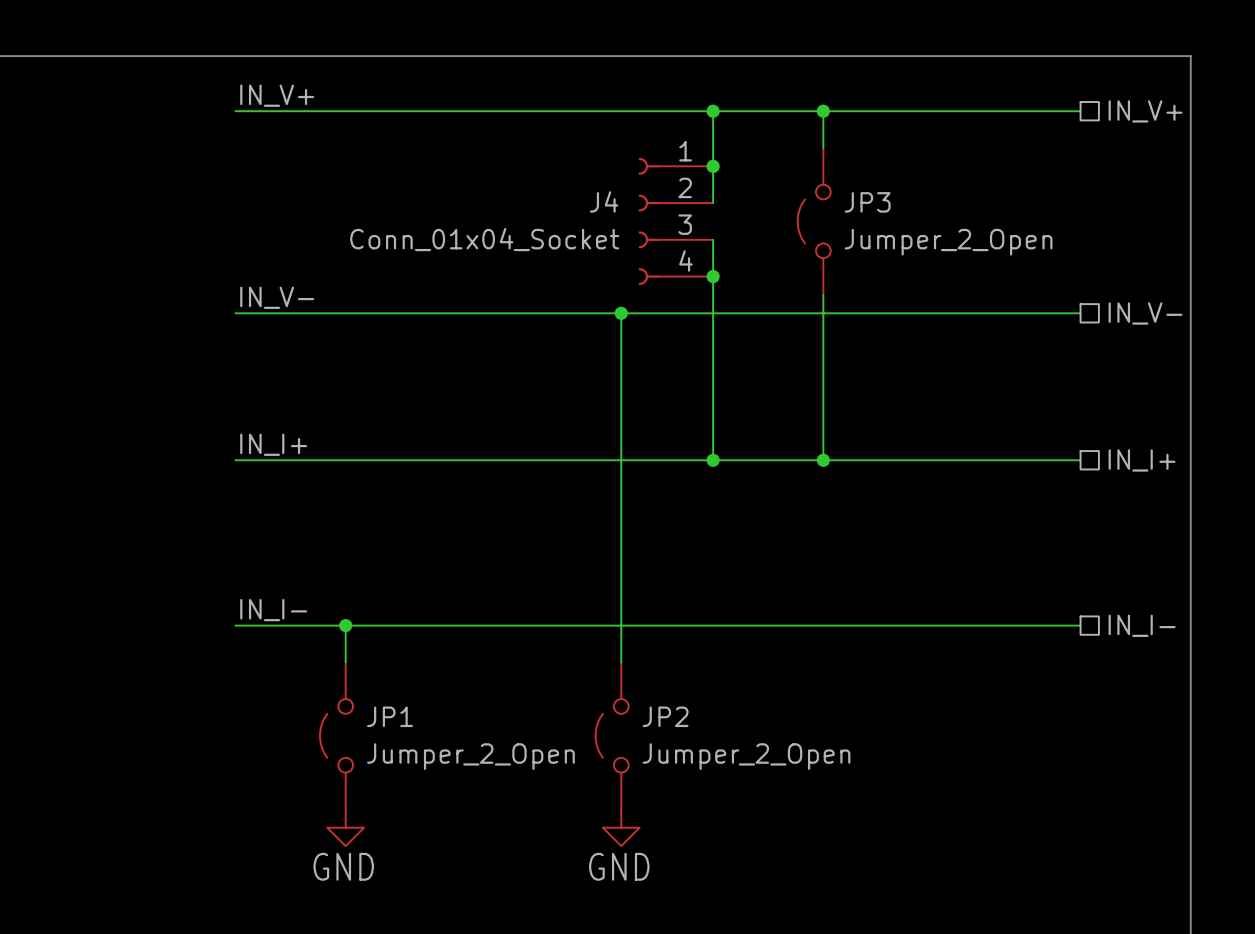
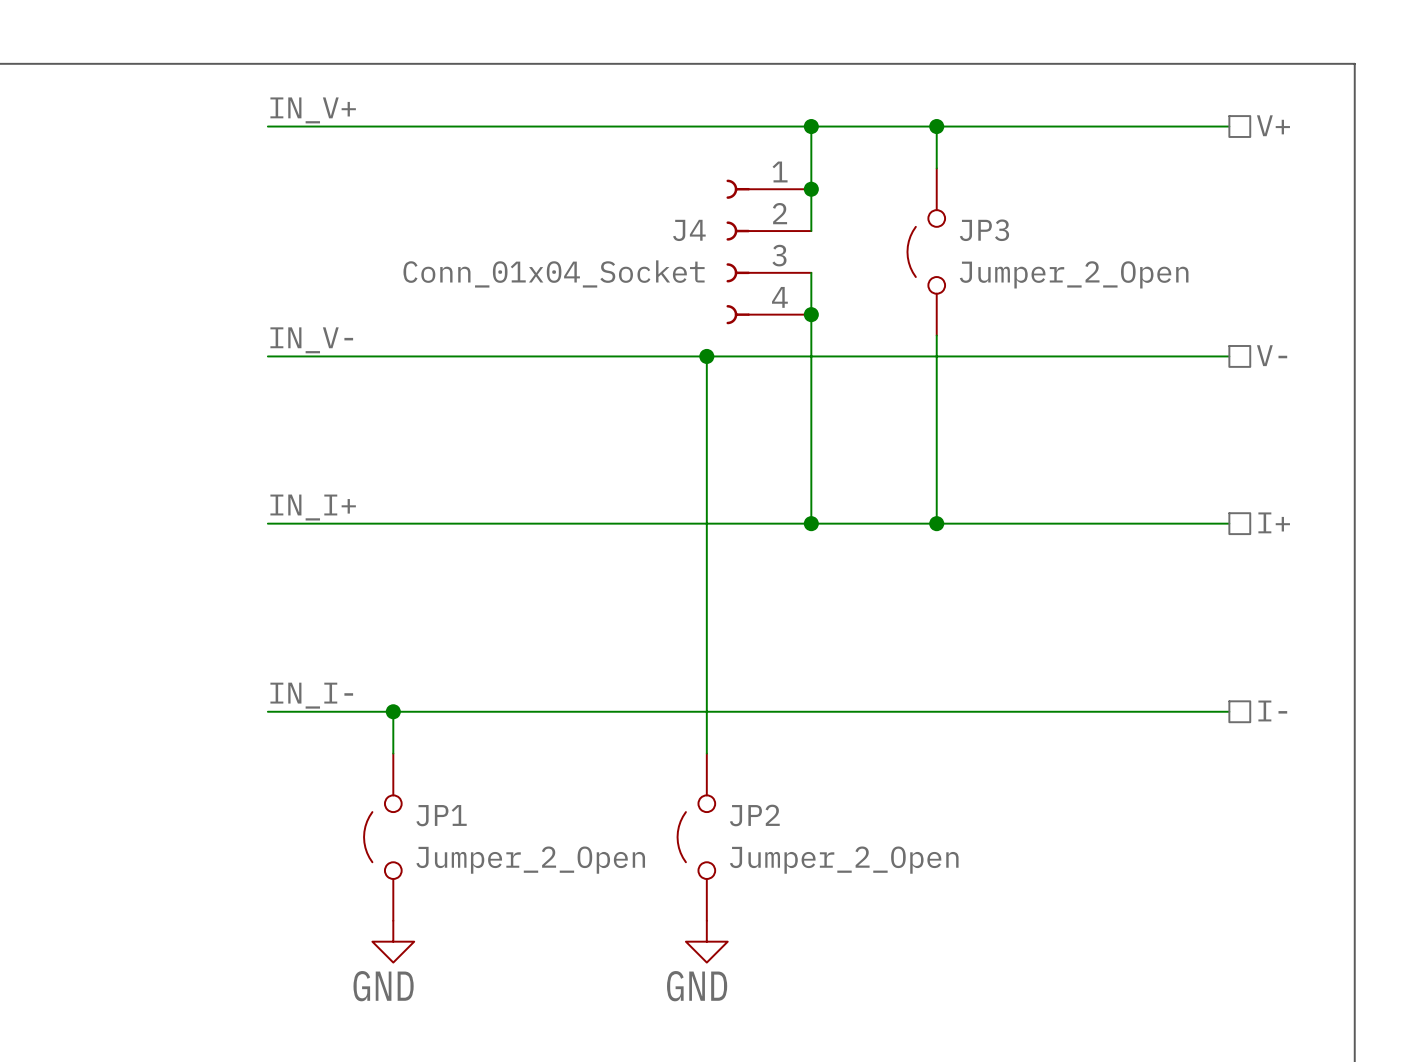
hierarchical label: IN_V+ (1145, 111) -> V+ (1273, 125)
hierarchical label: IN_V- (1145, 313) -> V- (1272, 355)
hierarchical label: IN_I+ (1142, 460) -> I+ (1274, 522)
hierarchical label: IN_I- (1142, 625) -> I- (1272, 710)

